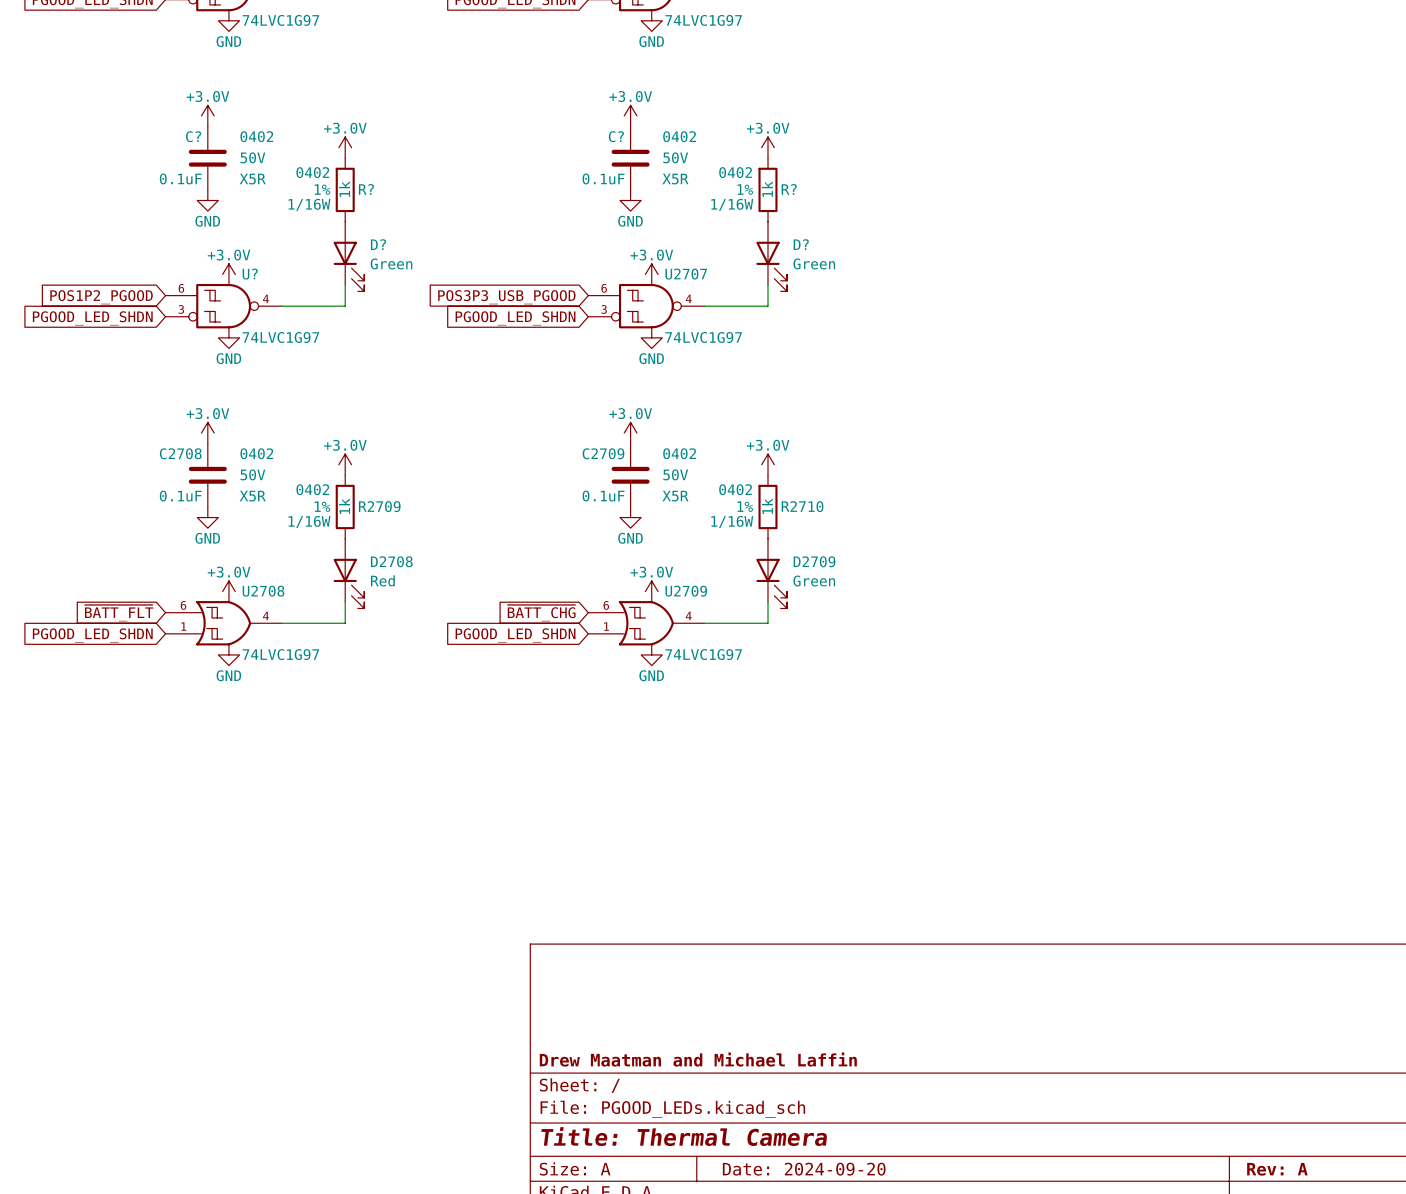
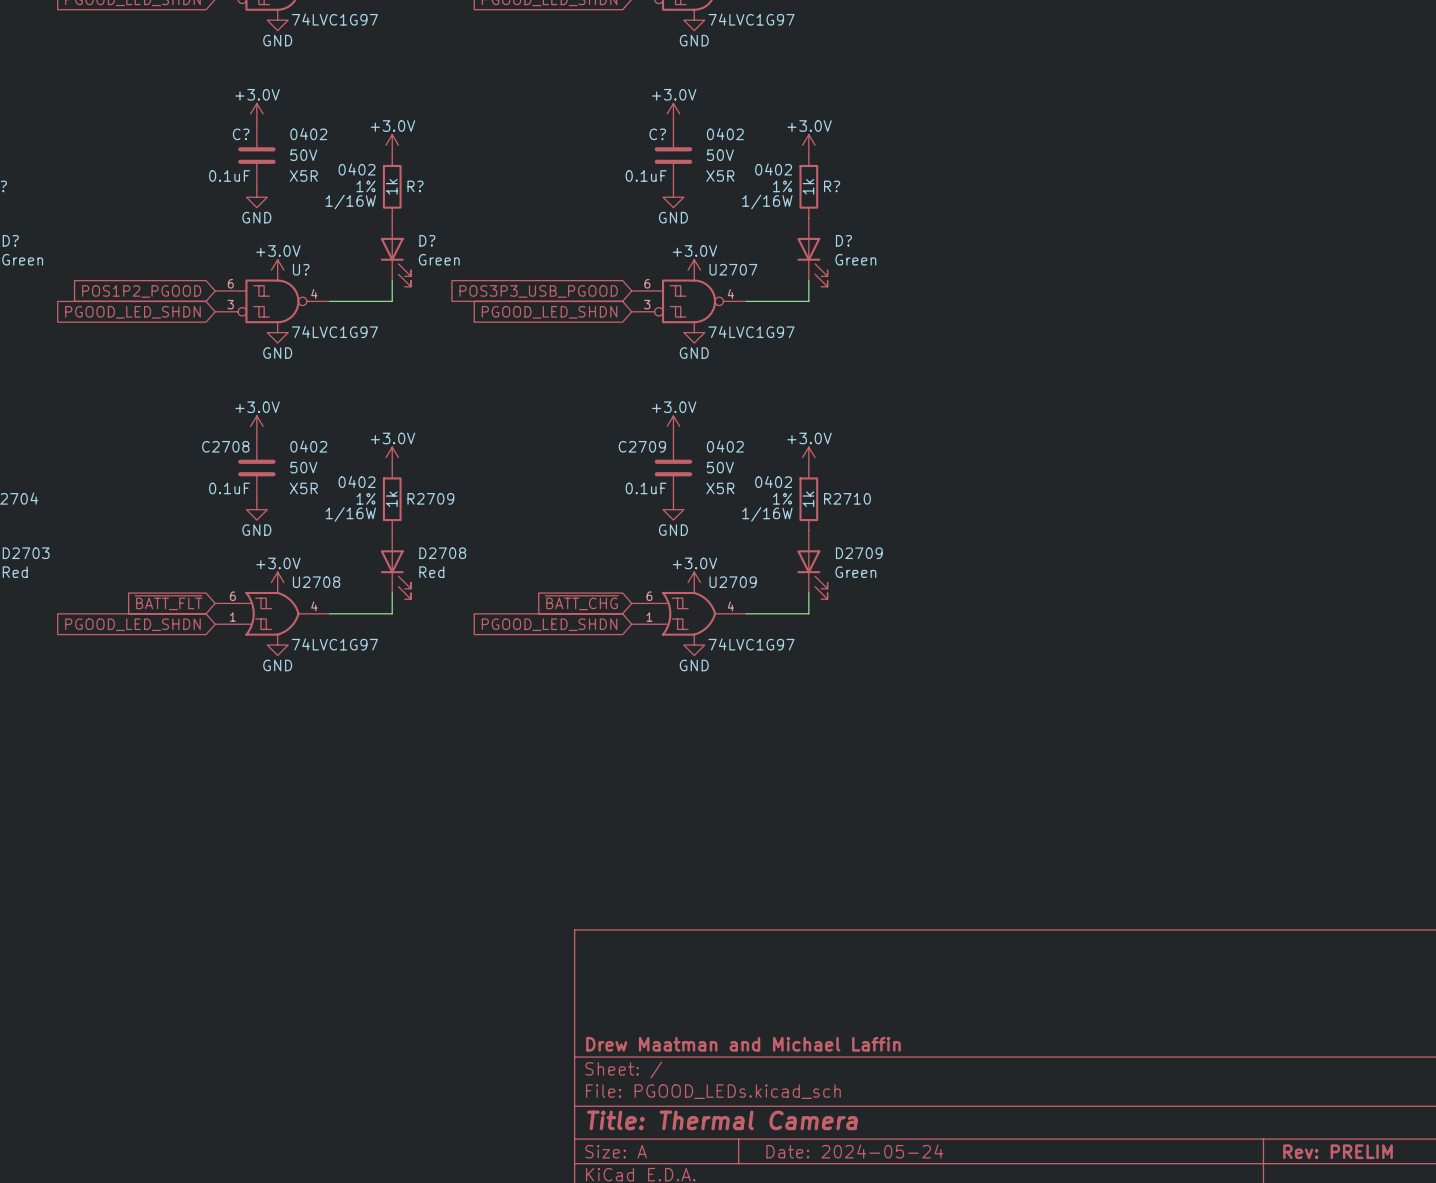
title block: Date: 2024-09-20 (804, 1169) -> Date: 2024-05-24 (854, 1151)
title block: Rev: A (1277, 1169) -> Rev: PRELIM (1338, 1151)

